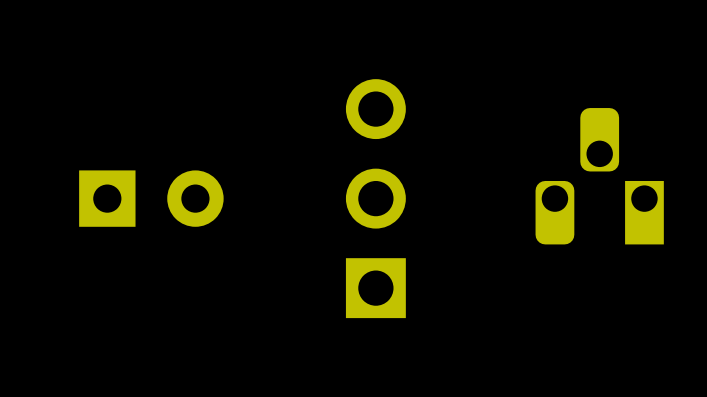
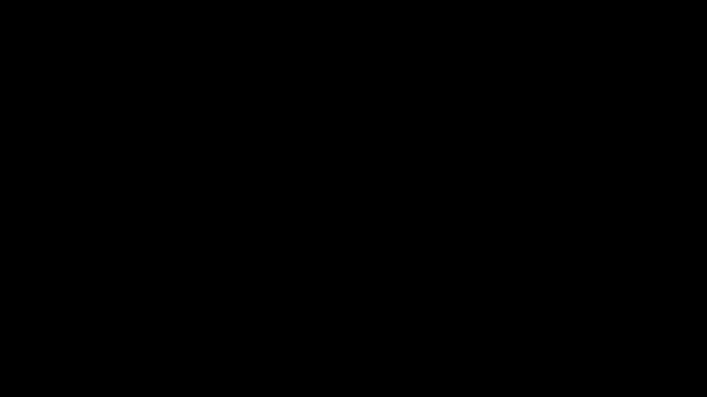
part: (599, 176) -> none
part: (151, 198) -> none
part: (375, 198) -> none

